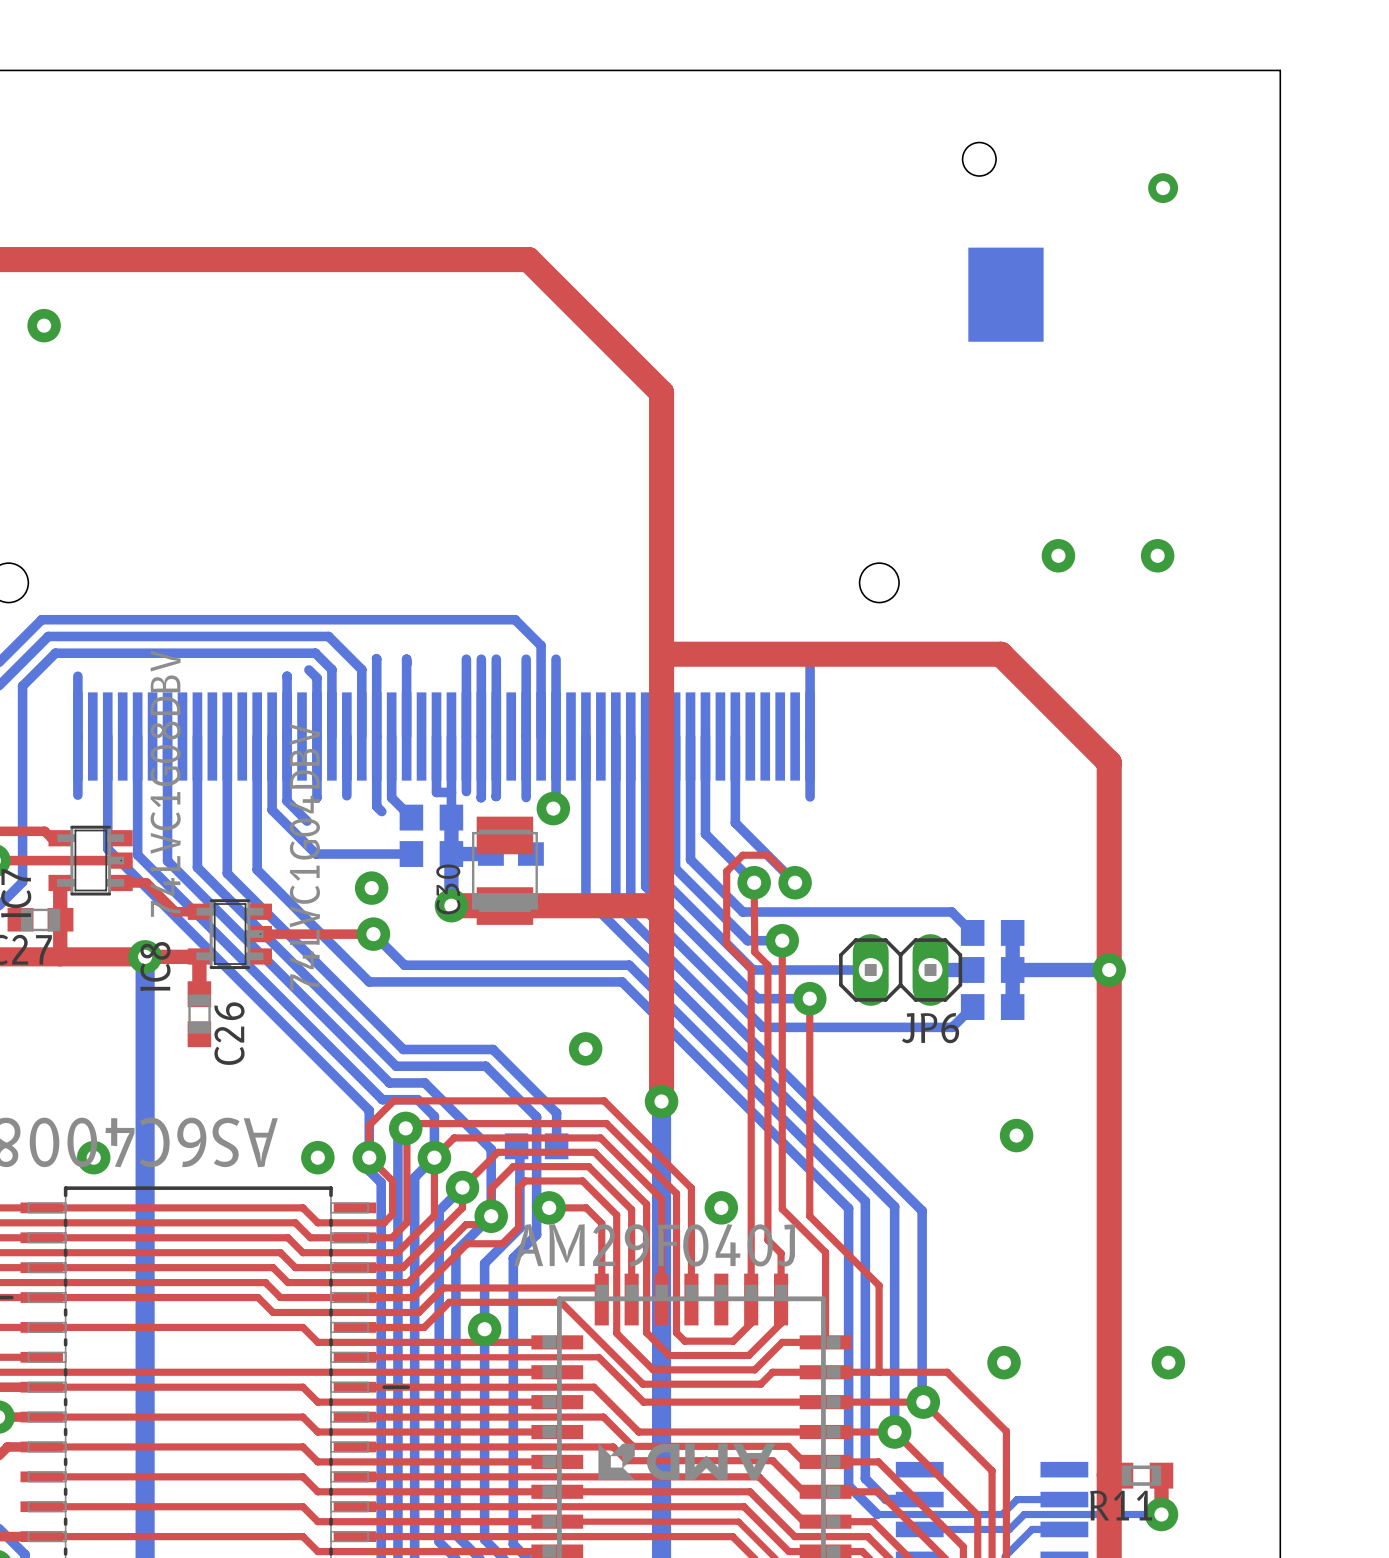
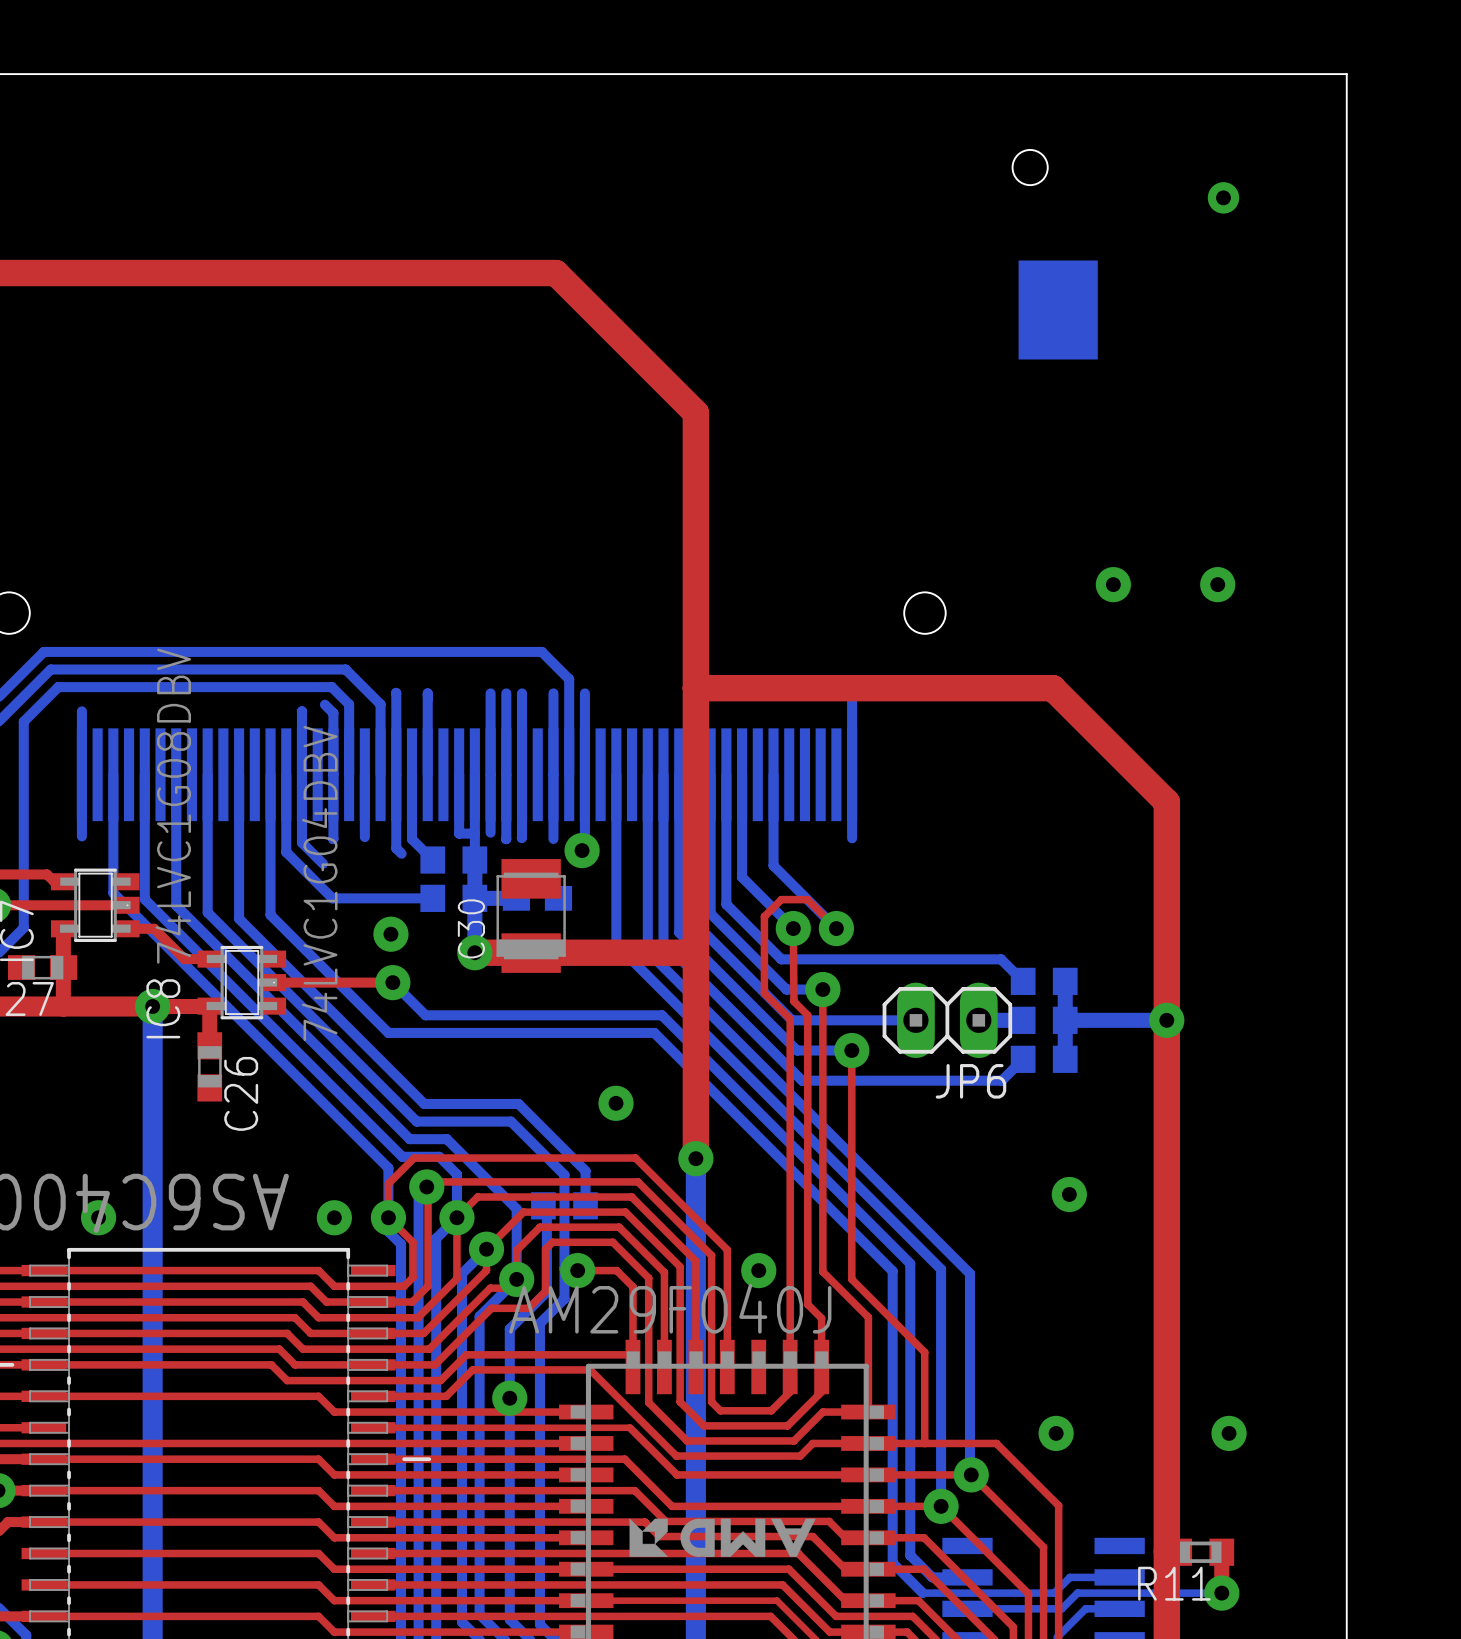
via: (44, 325) -> none

